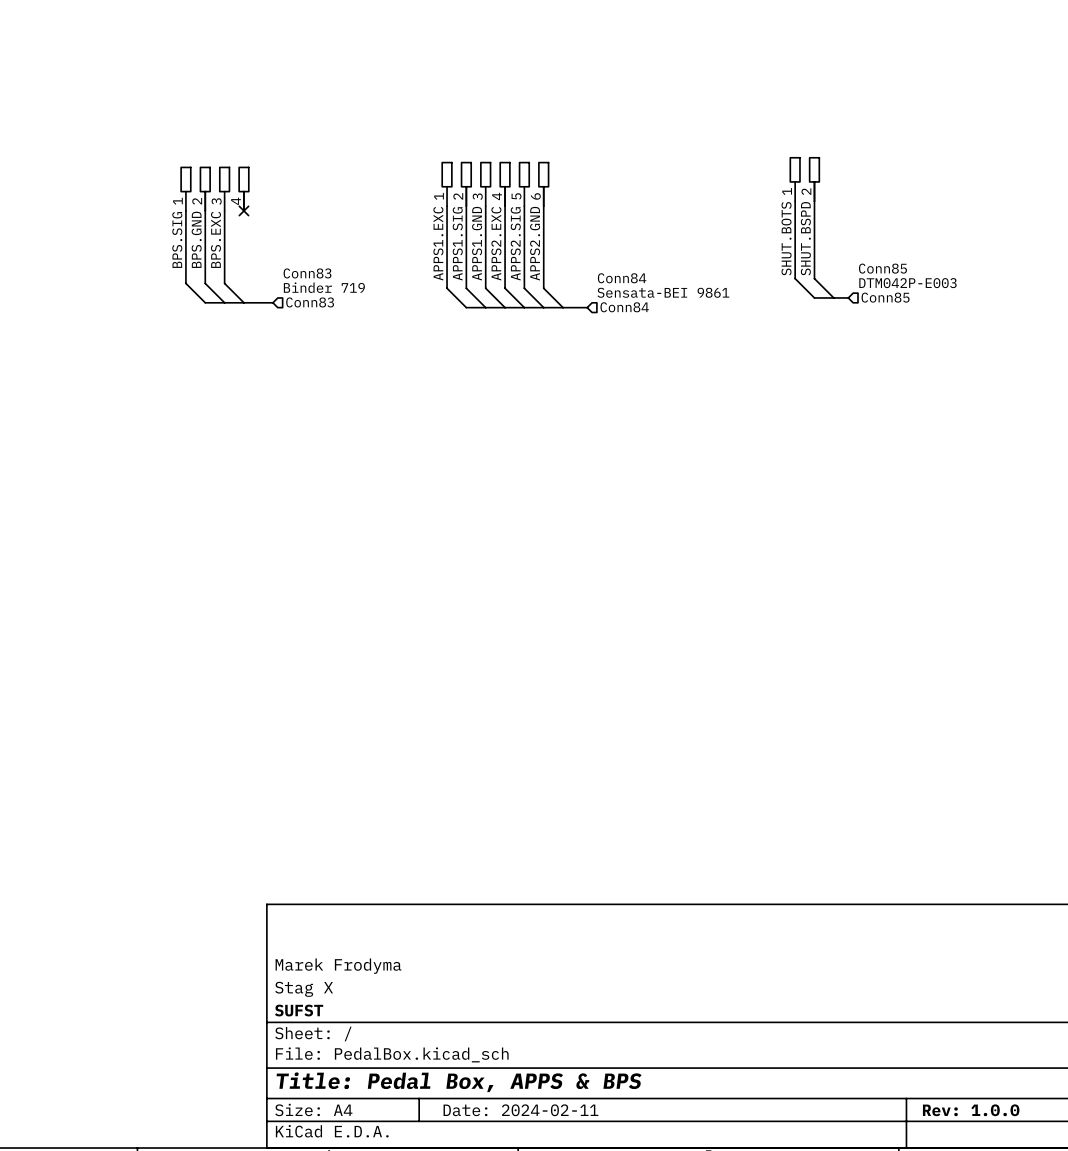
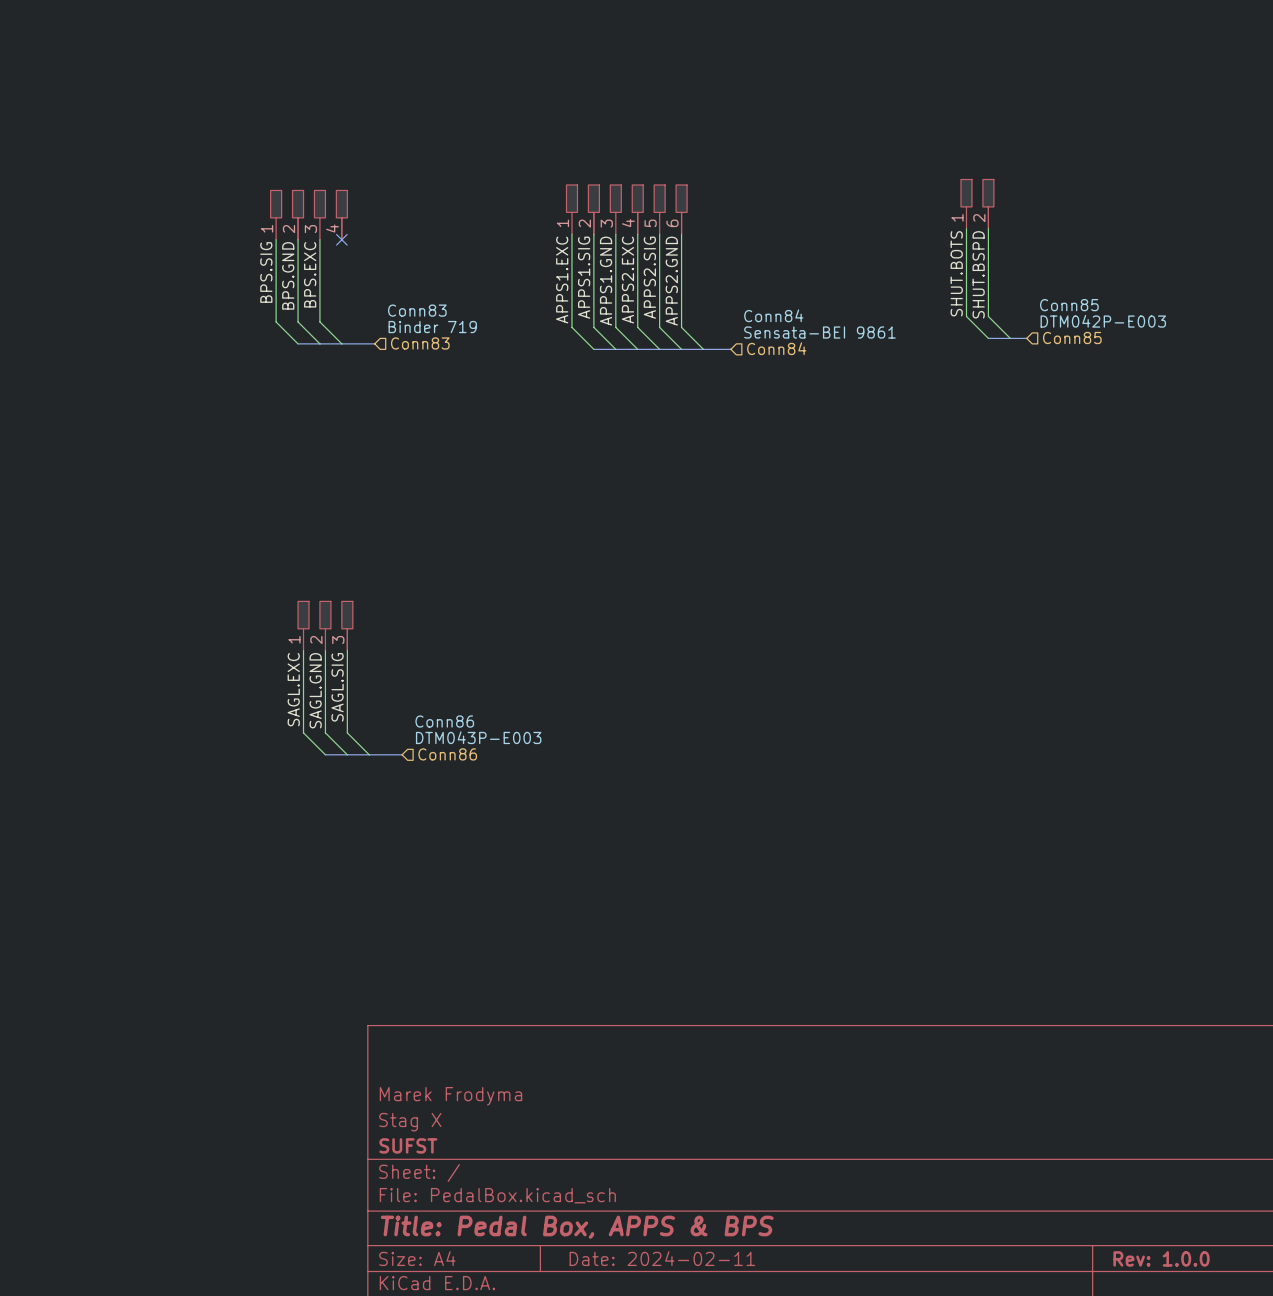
Conn86: none -> (325, 626)
wire: none -> (303, 650) (303, 732) (325, 754)
wire: none -> (325, 650) (325, 732) (347, 754)
wire: none -> (347, 650) (347, 732) (369, 754)
label: none -> SAGL.EXC (293, 689)
label: none -> SAGL.GND (315, 690)
label: none -> SAGL.SIG (337, 687)
bus: none -> (325, 754) (402, 754)
hierarchical label: none -> Conn86 (447, 754)

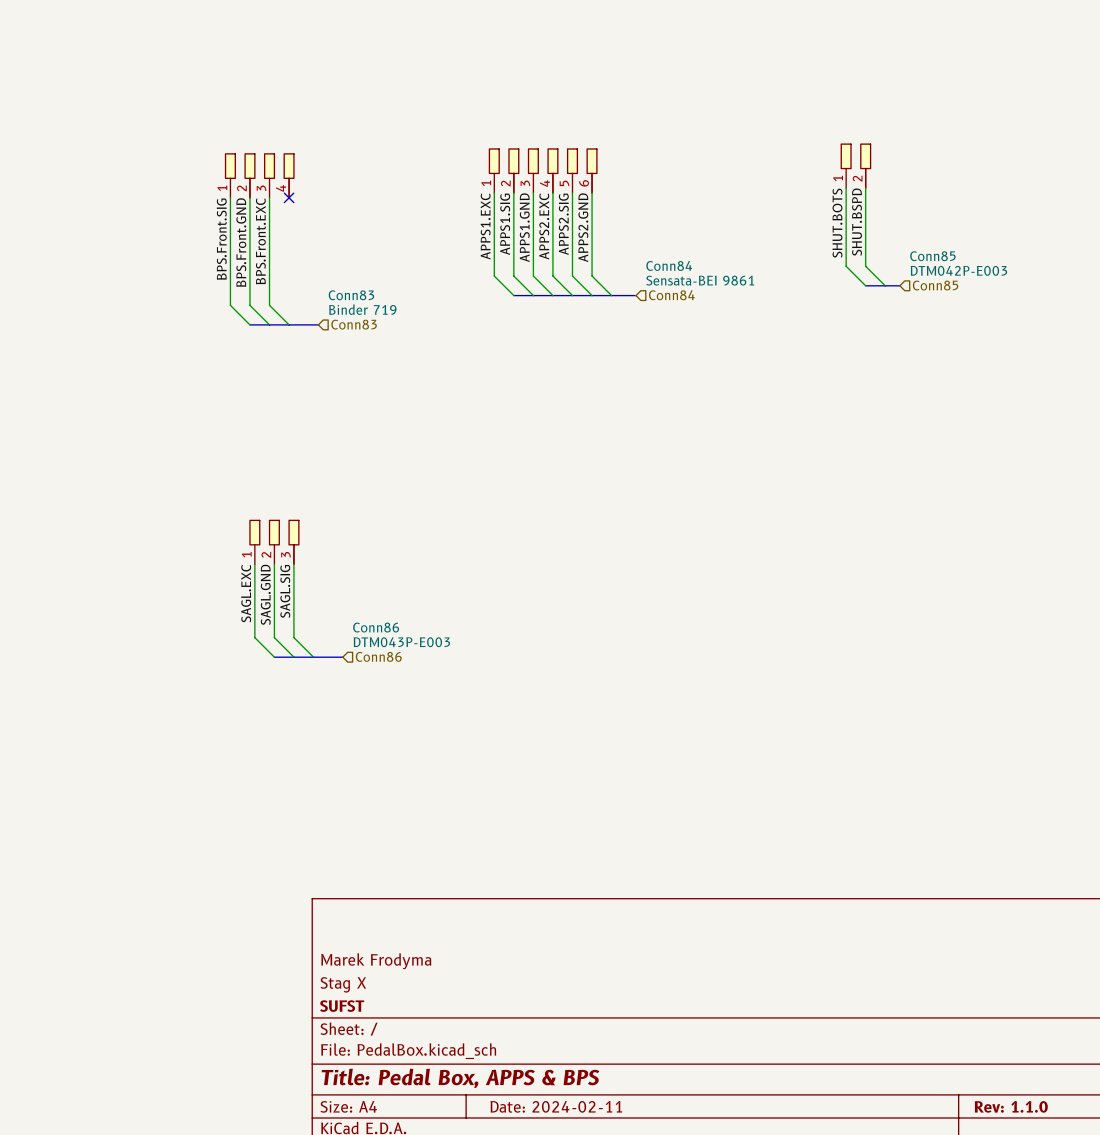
label: BPS.SIG (266, 272) -> BPS.Front.SIG (221, 239)
label: BPS.EXC (310, 274) -> BPS.Front.EXC (260, 241)
label: BPS.GND (288, 275) -> BPS.Front.GND (241, 242)
Conn83 name position: Conn83 (417, 310) -> Conn83 (351, 295)
wire: (276, 321) (298, 343) -> (230, 271) (230, 305) (249, 324)
wire: (298, 321) (319, 343) -> (249, 271) (249, 305) (269, 324)
wire: (319, 321) (341, 343) -> (269, 271) (269, 305) (289, 324)
Conn83 text position: Binder 719 (432, 327) -> Binder 719 (362, 309)
bus: (298, 343) (374, 343) -> (249, 324) (318, 324)
hierarchical label position: Conn83 (420, 343) -> Conn83 (354, 324)
title block: Rev: 1.0.0 (1161, 1258) -> Rev: 1.1.0 (1011, 1106)

